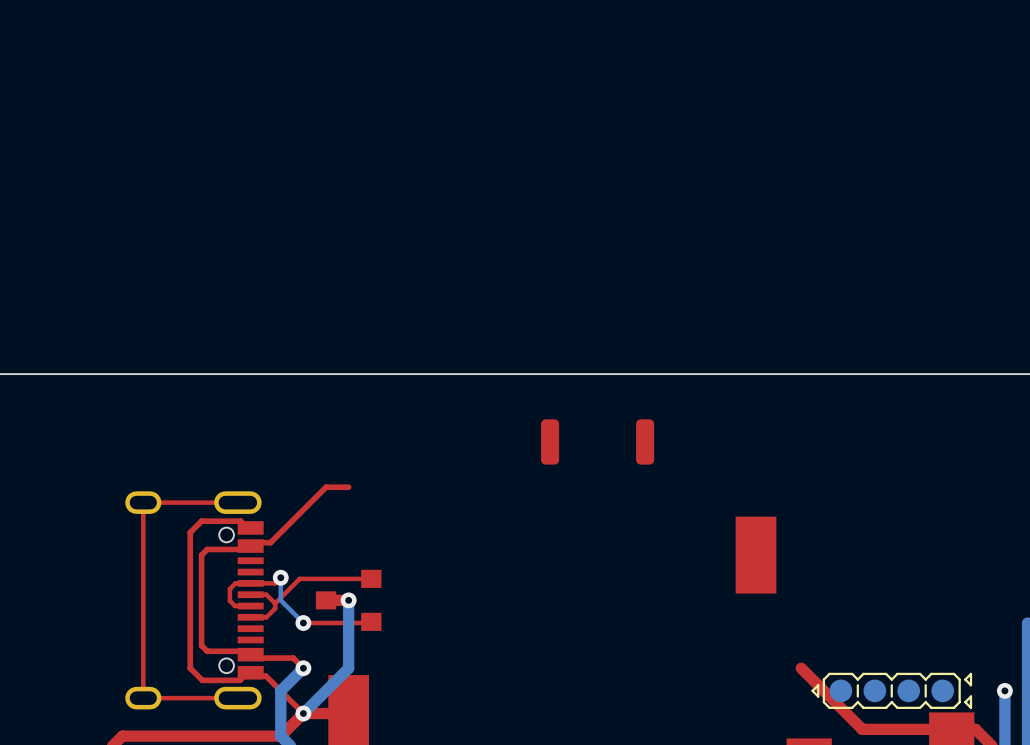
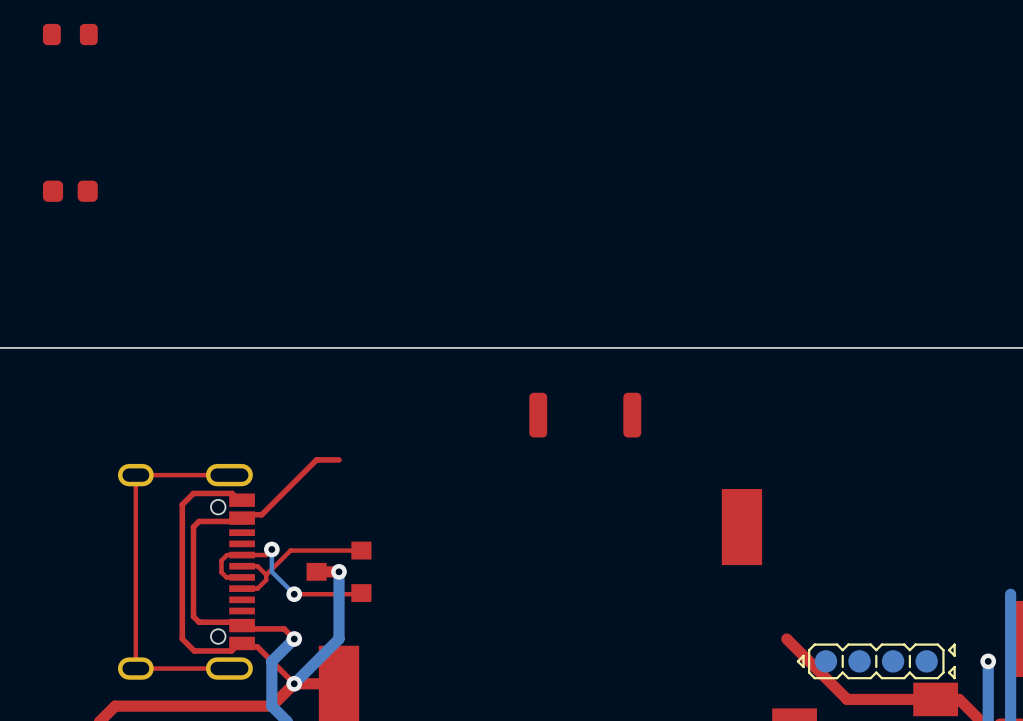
part: none -> (70, 34)
part: none -> (70, 191)

